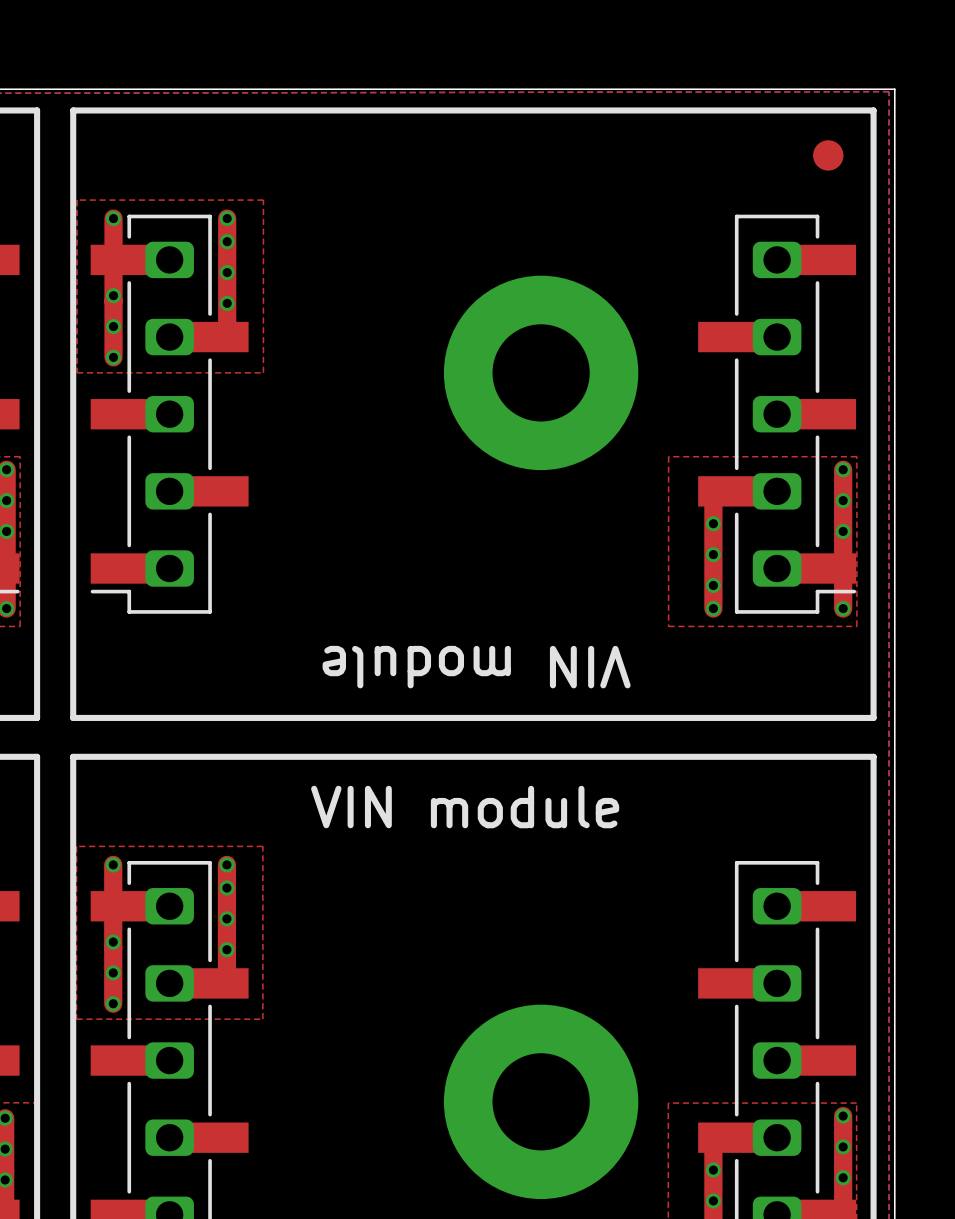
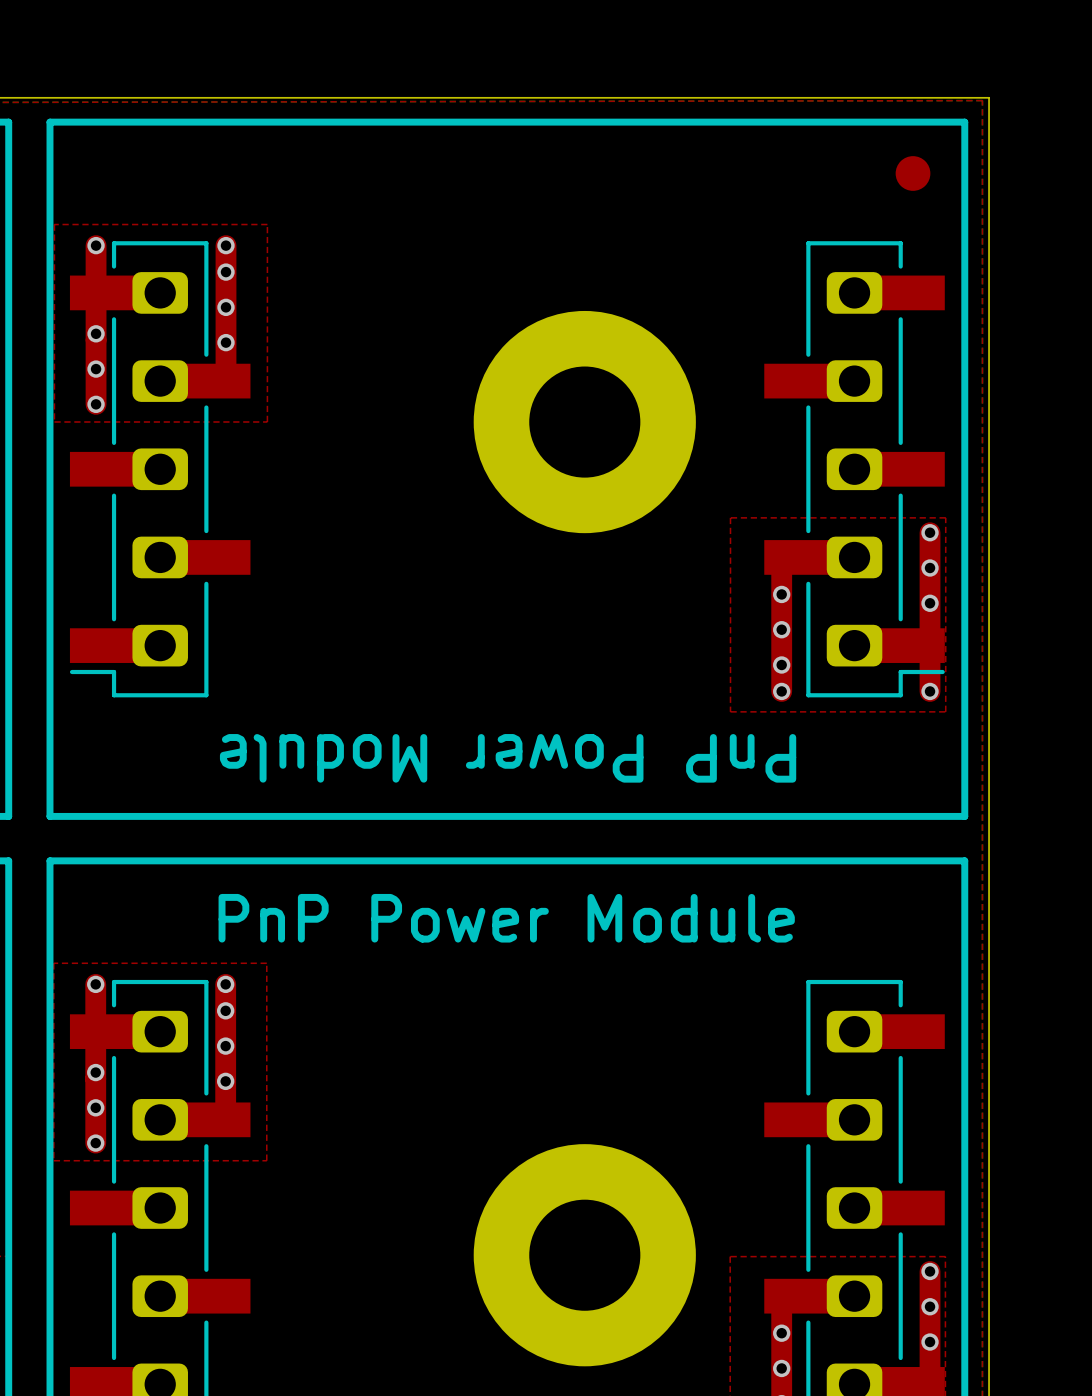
text: none -> PnP Power Module (508, 758)
text: VIN module (476, 667) -> none
text: VIN module (465, 807) -> none
text: none -> PnP Power Module (506, 918)

